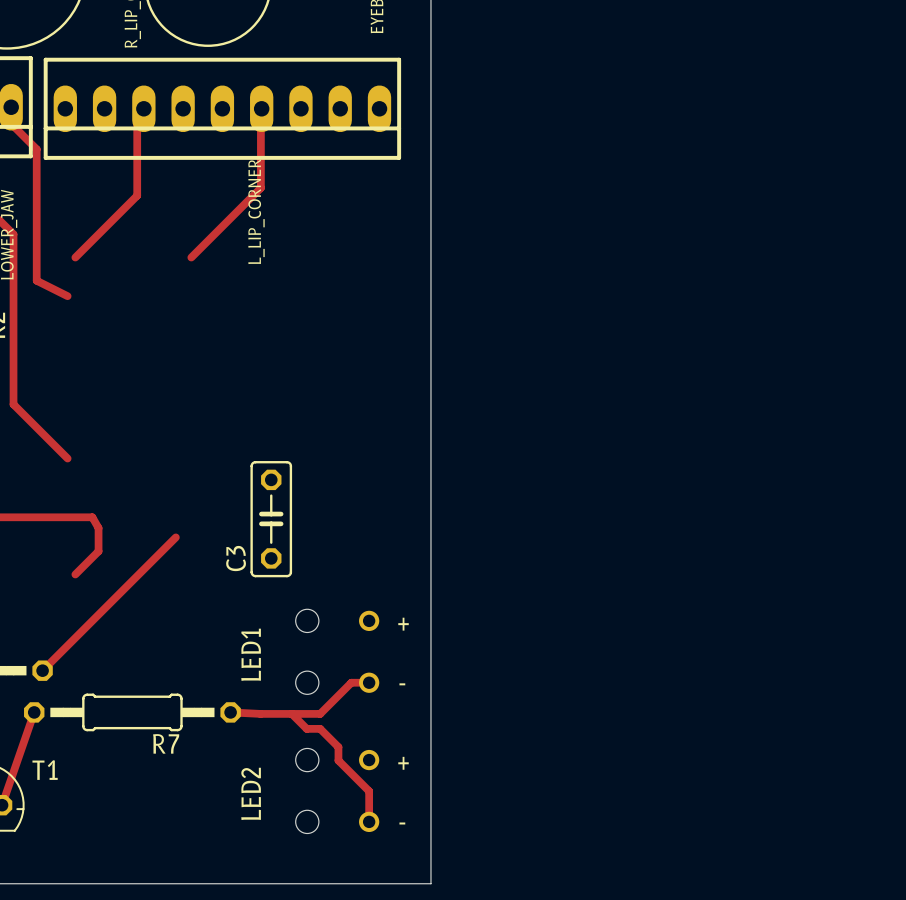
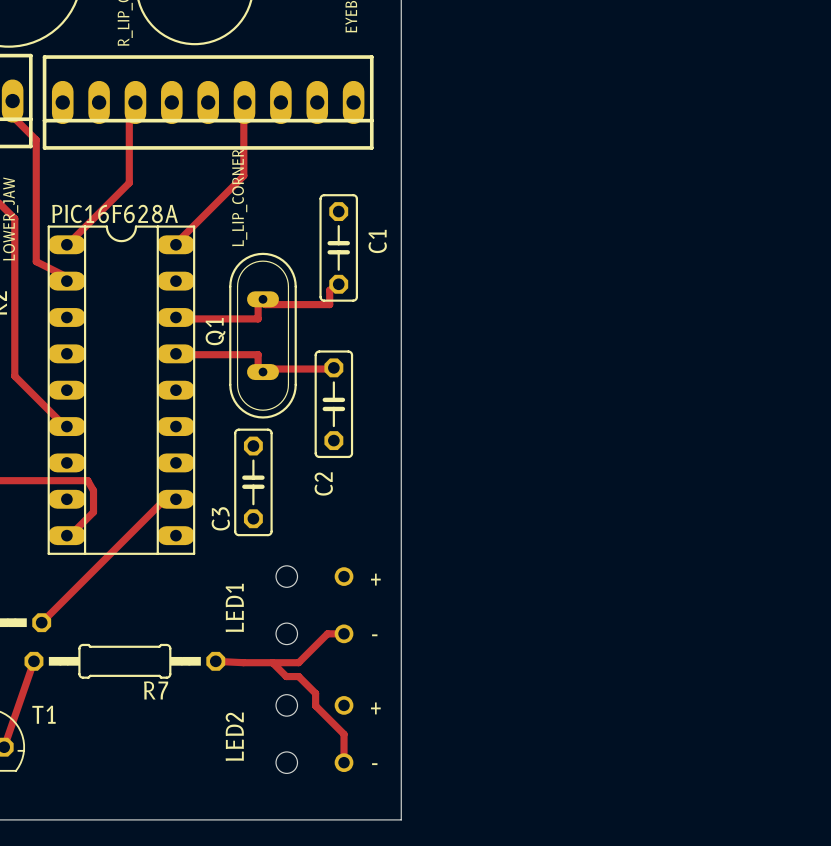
C1: none -> (338, 247)
track: none -> (338, 284) (329, 290) (329, 304) (265, 304) (263, 299) (258, 304) (258, 318) (175, 317)
Q1: none -> (263, 335)
track: none -> (175, 353) (258, 354) (258, 369) (263, 372) (265, 369) (333, 367)
PIC16F628A: none -> (121, 390)
C2: none -> (333, 404)

